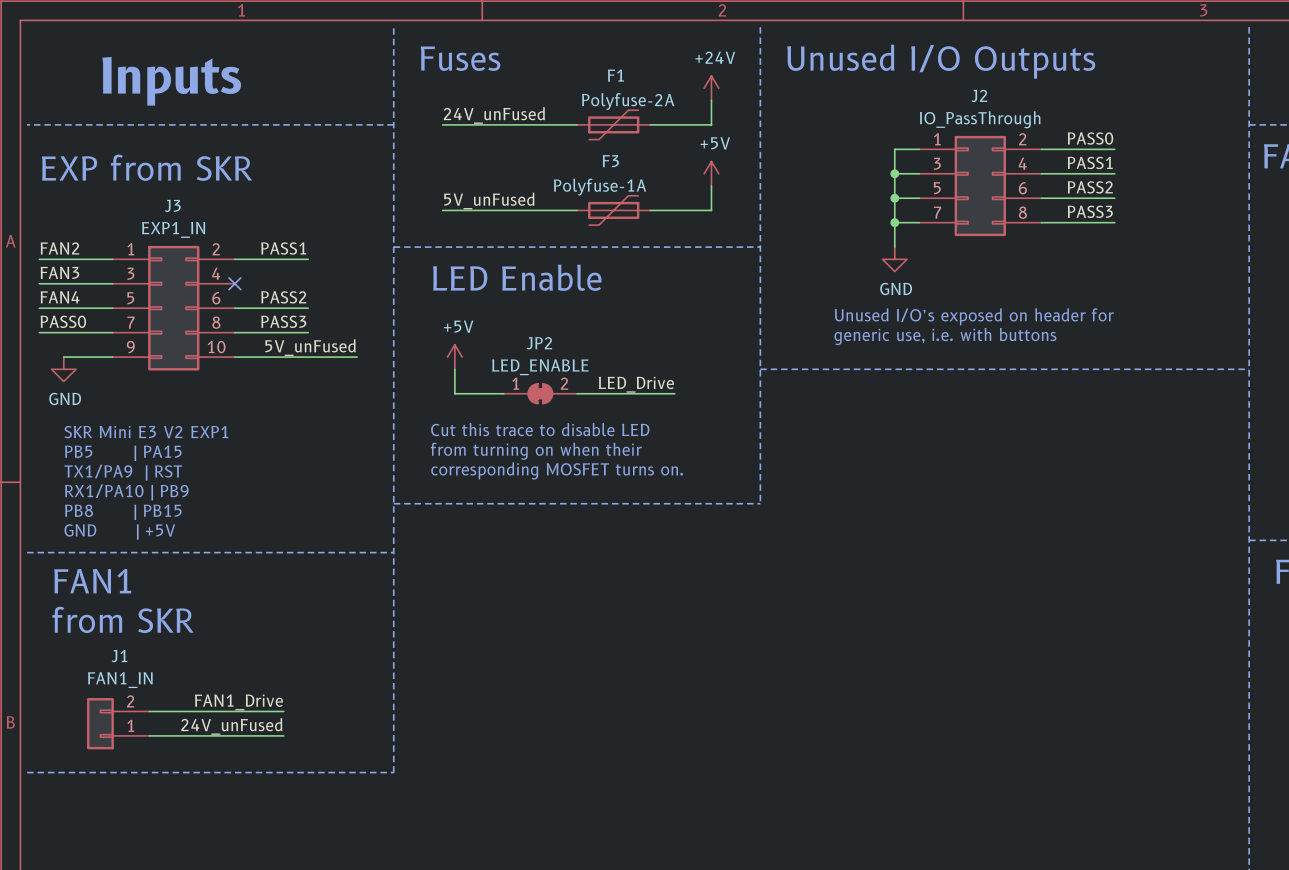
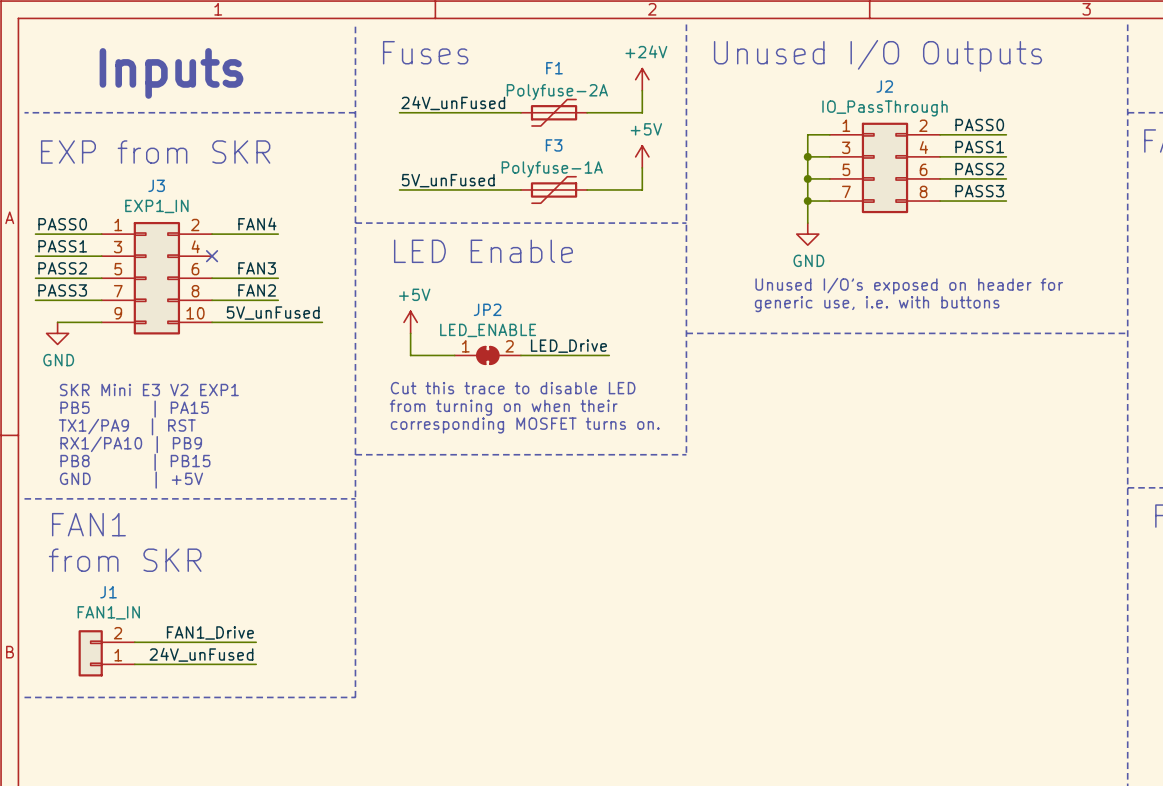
label: FAN2 (59, 248) -> PASS0 (62, 224)
label: PASS1 (283, 248) -> FAN4 (257, 224)
label: FAN3 (59, 272) -> PASS1 (62, 246)
label: FAN4 (60, 297) -> PASS2 (62, 268)
label: PASS2 (283, 297) -> FAN3 (257, 268)
label: PASS0 (63, 321) -> PASS3 (62, 290)
label: PASS3 (283, 321) -> FAN2 (257, 290)

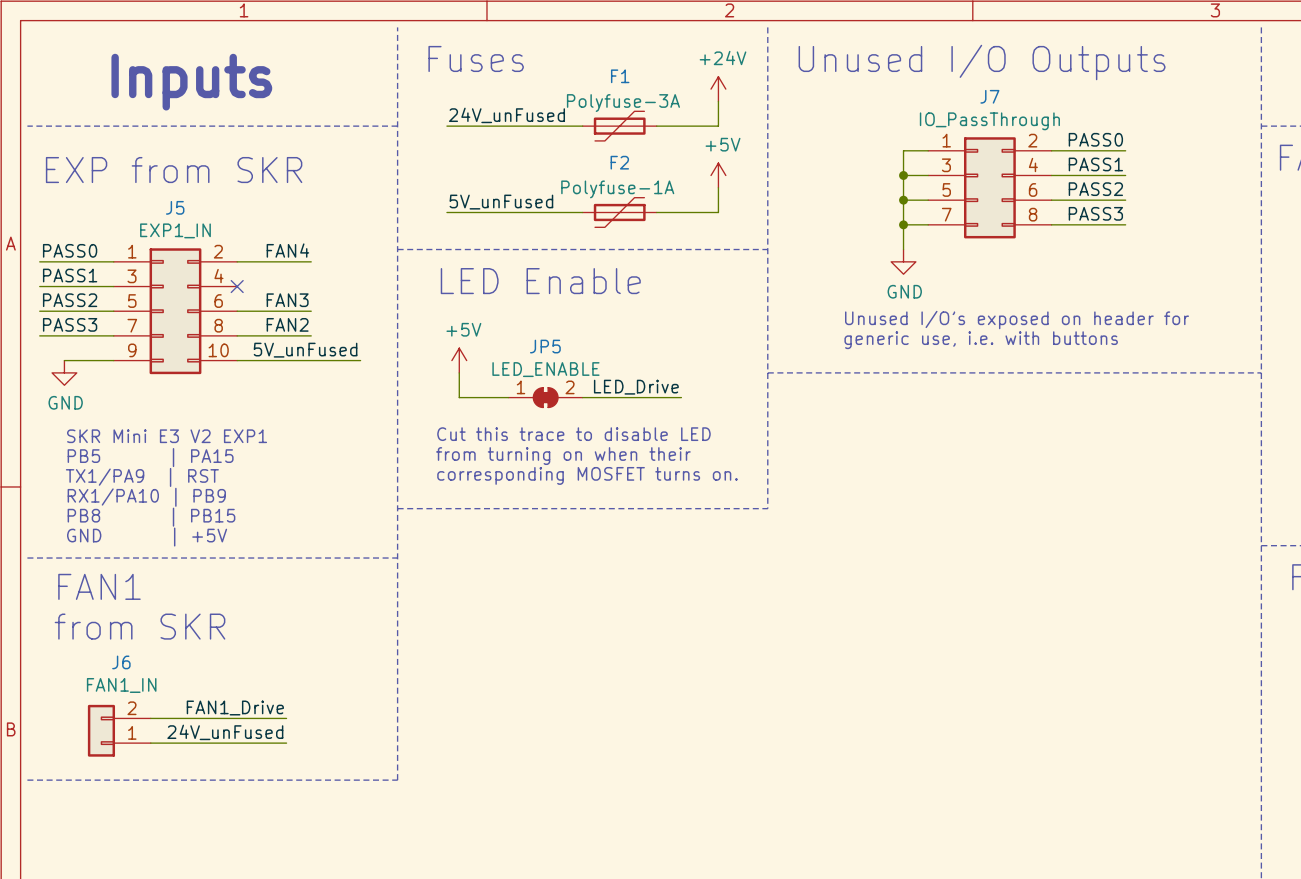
J2 name: J2 (884, 86) -> J7 (989, 96)
F1 value: Polyfuse-2A (557, 92) -> Polyfuse-3A (623, 103)
F3 name: F3 (554, 145) -> F2 (619, 162)
J3 name: J3 (156, 185) -> J5 (175, 207)
JP2 name: JP2 (487, 309) -> JP5 (545, 346)
J1 name: J1 (108, 592) -> J6 (121, 662)

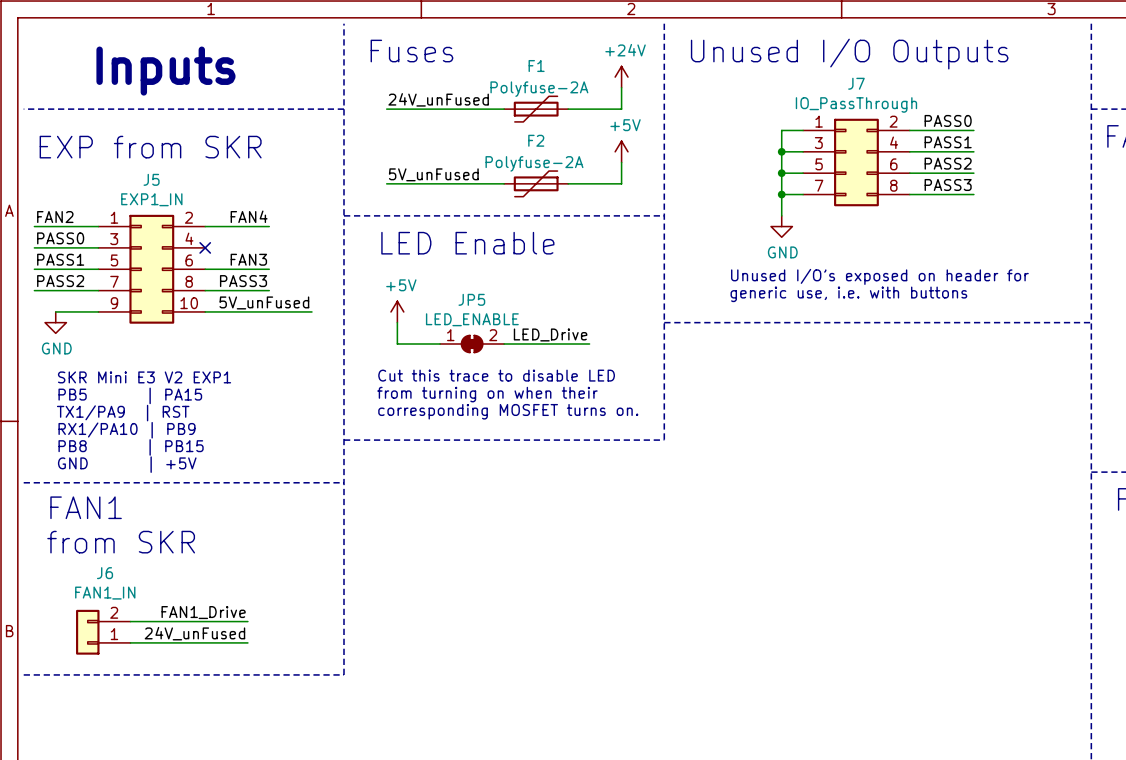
F1 value: Polyfuse-3A (623, 103) -> Polyfuse-2A (539, 89)
F2 value: Polyfuse-1A (617, 189) -> Polyfuse-2A (534, 163)
label: PASS0 (70, 250) -> FAN2 (55, 217)
label: PASS1 (70, 275) -> PASS0 (60, 238)
label: PASS2 (70, 300) -> PASS1 (60, 259)
label: PASS3 (70, 324) -> PASS2 (60, 281)
label: FAN2 (287, 324) -> PASS3 (243, 281)

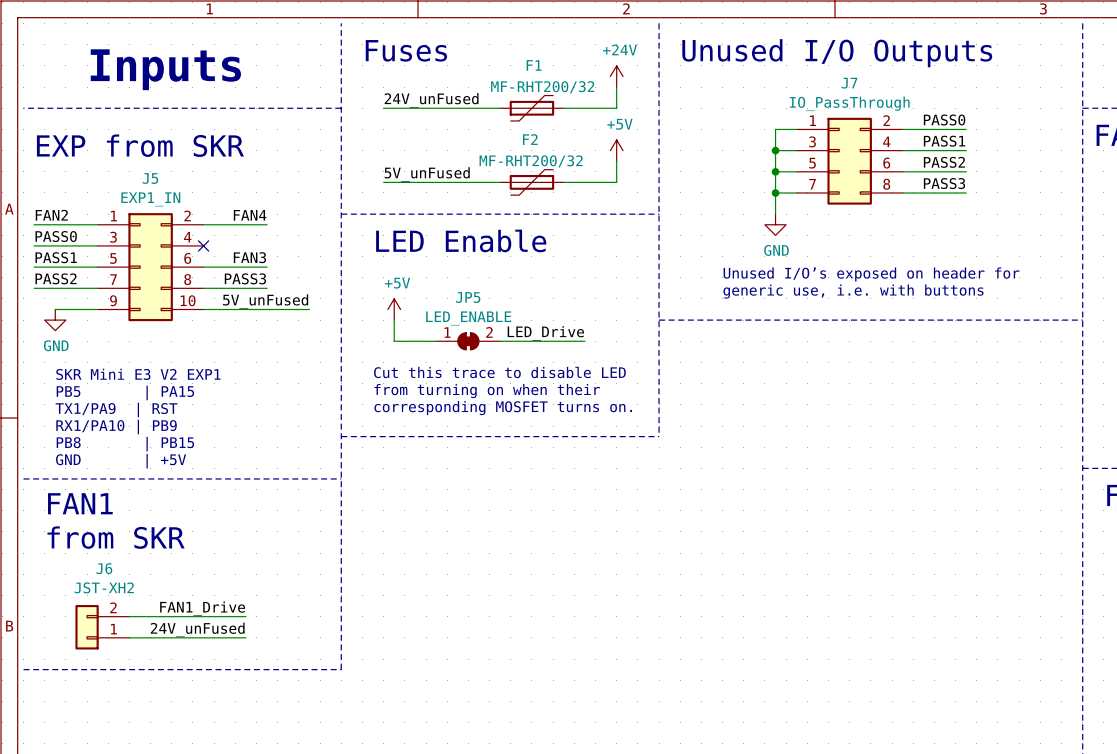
F1 value: Polyfuse-2A (539, 89) -> MF-RHT200/32 (542, 87)
F2 value: Polyfuse-2A (534, 163) -> MF-RHT200/32 (531, 161)
J6 value: FAN1_IN (105, 593) -> JST-XH2 (104, 587)

